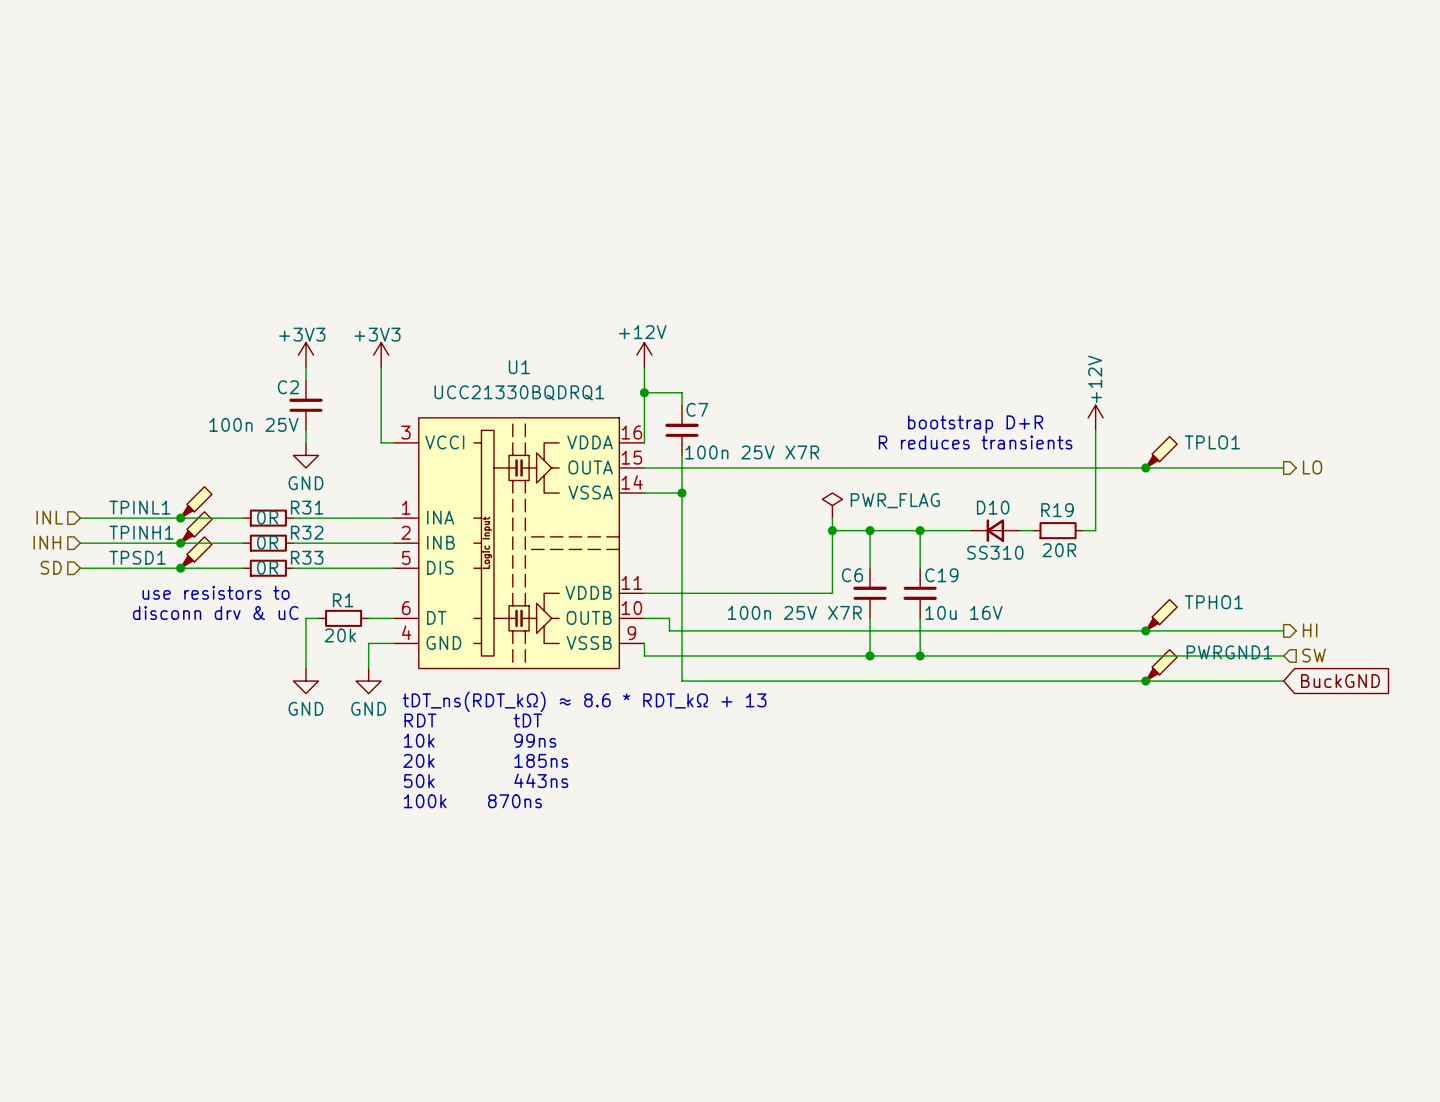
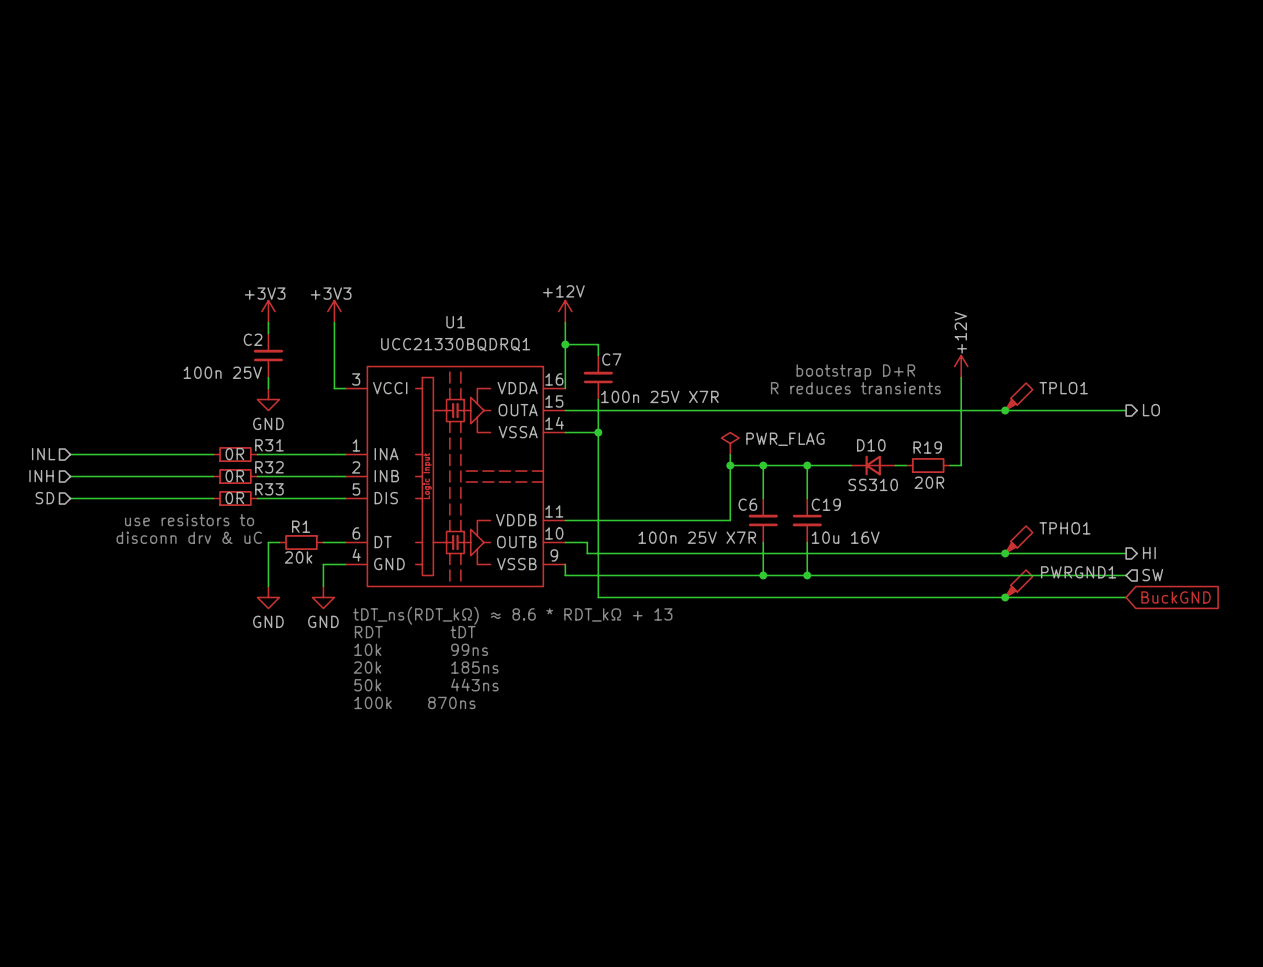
TPINL1: (196, 502) -> none
junction: (180, 518) -> none
TPINH1: (196, 527) -> none
junction: (180, 543) -> none
TPSD1: (196, 552) -> none
junction: (180, 568) -> none

